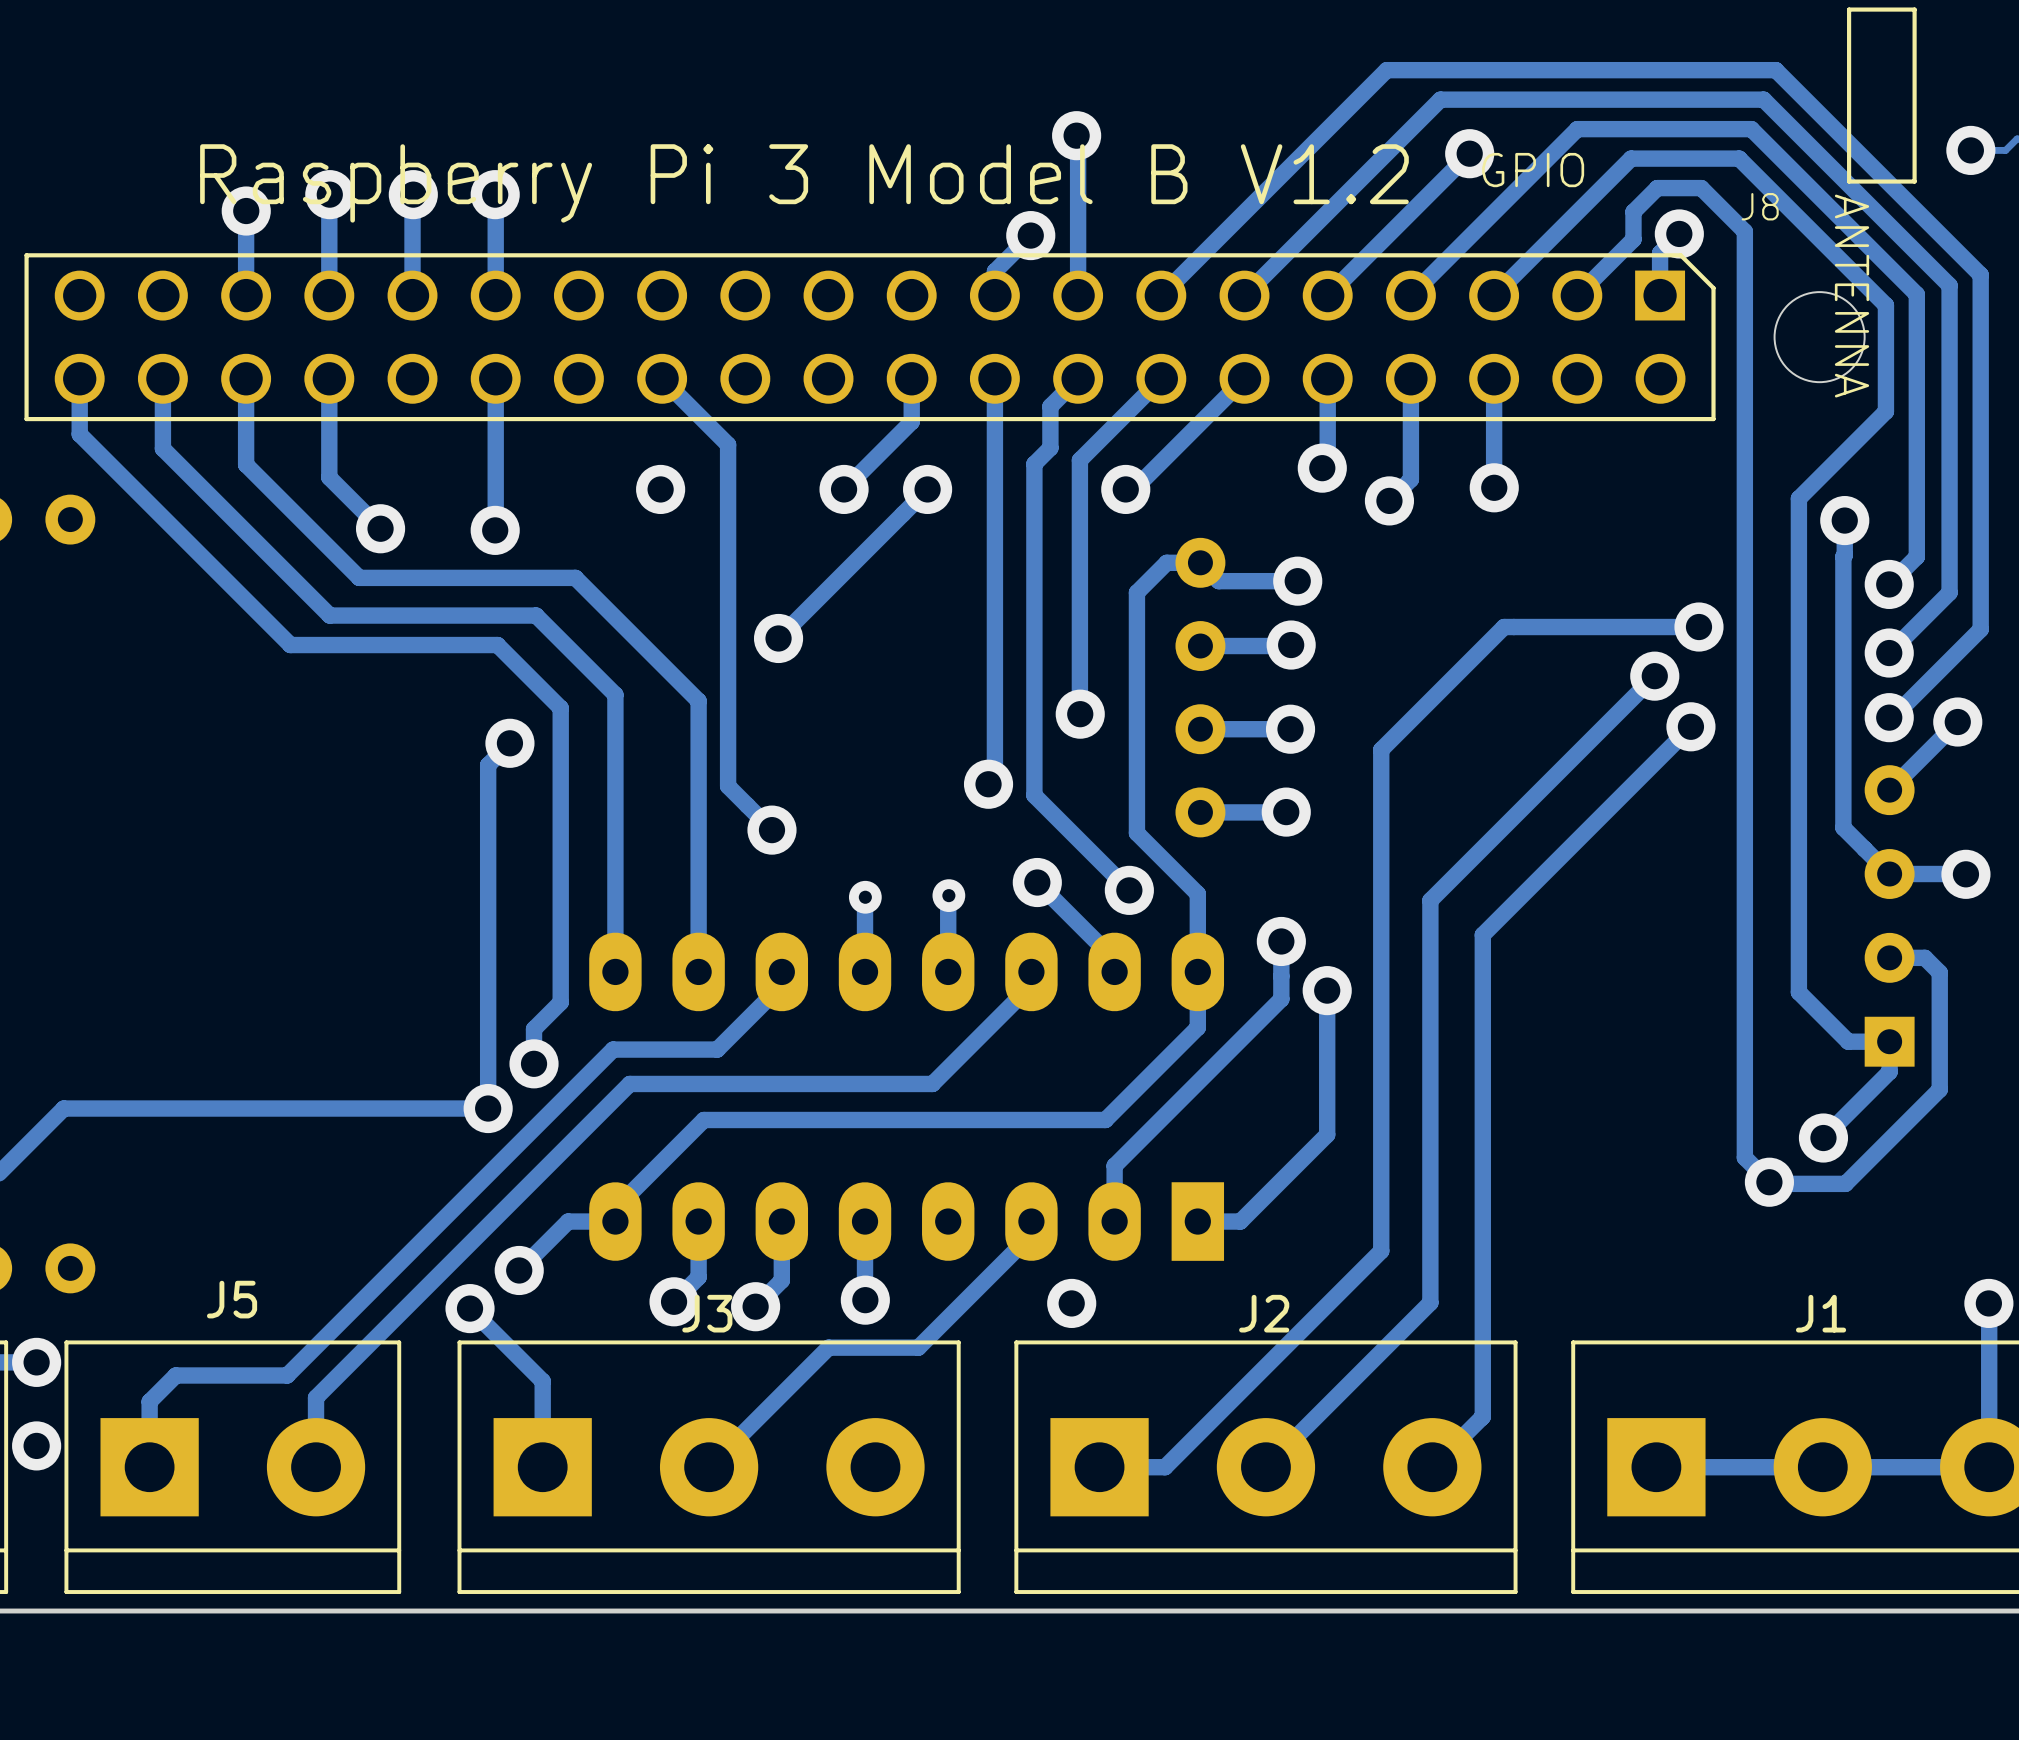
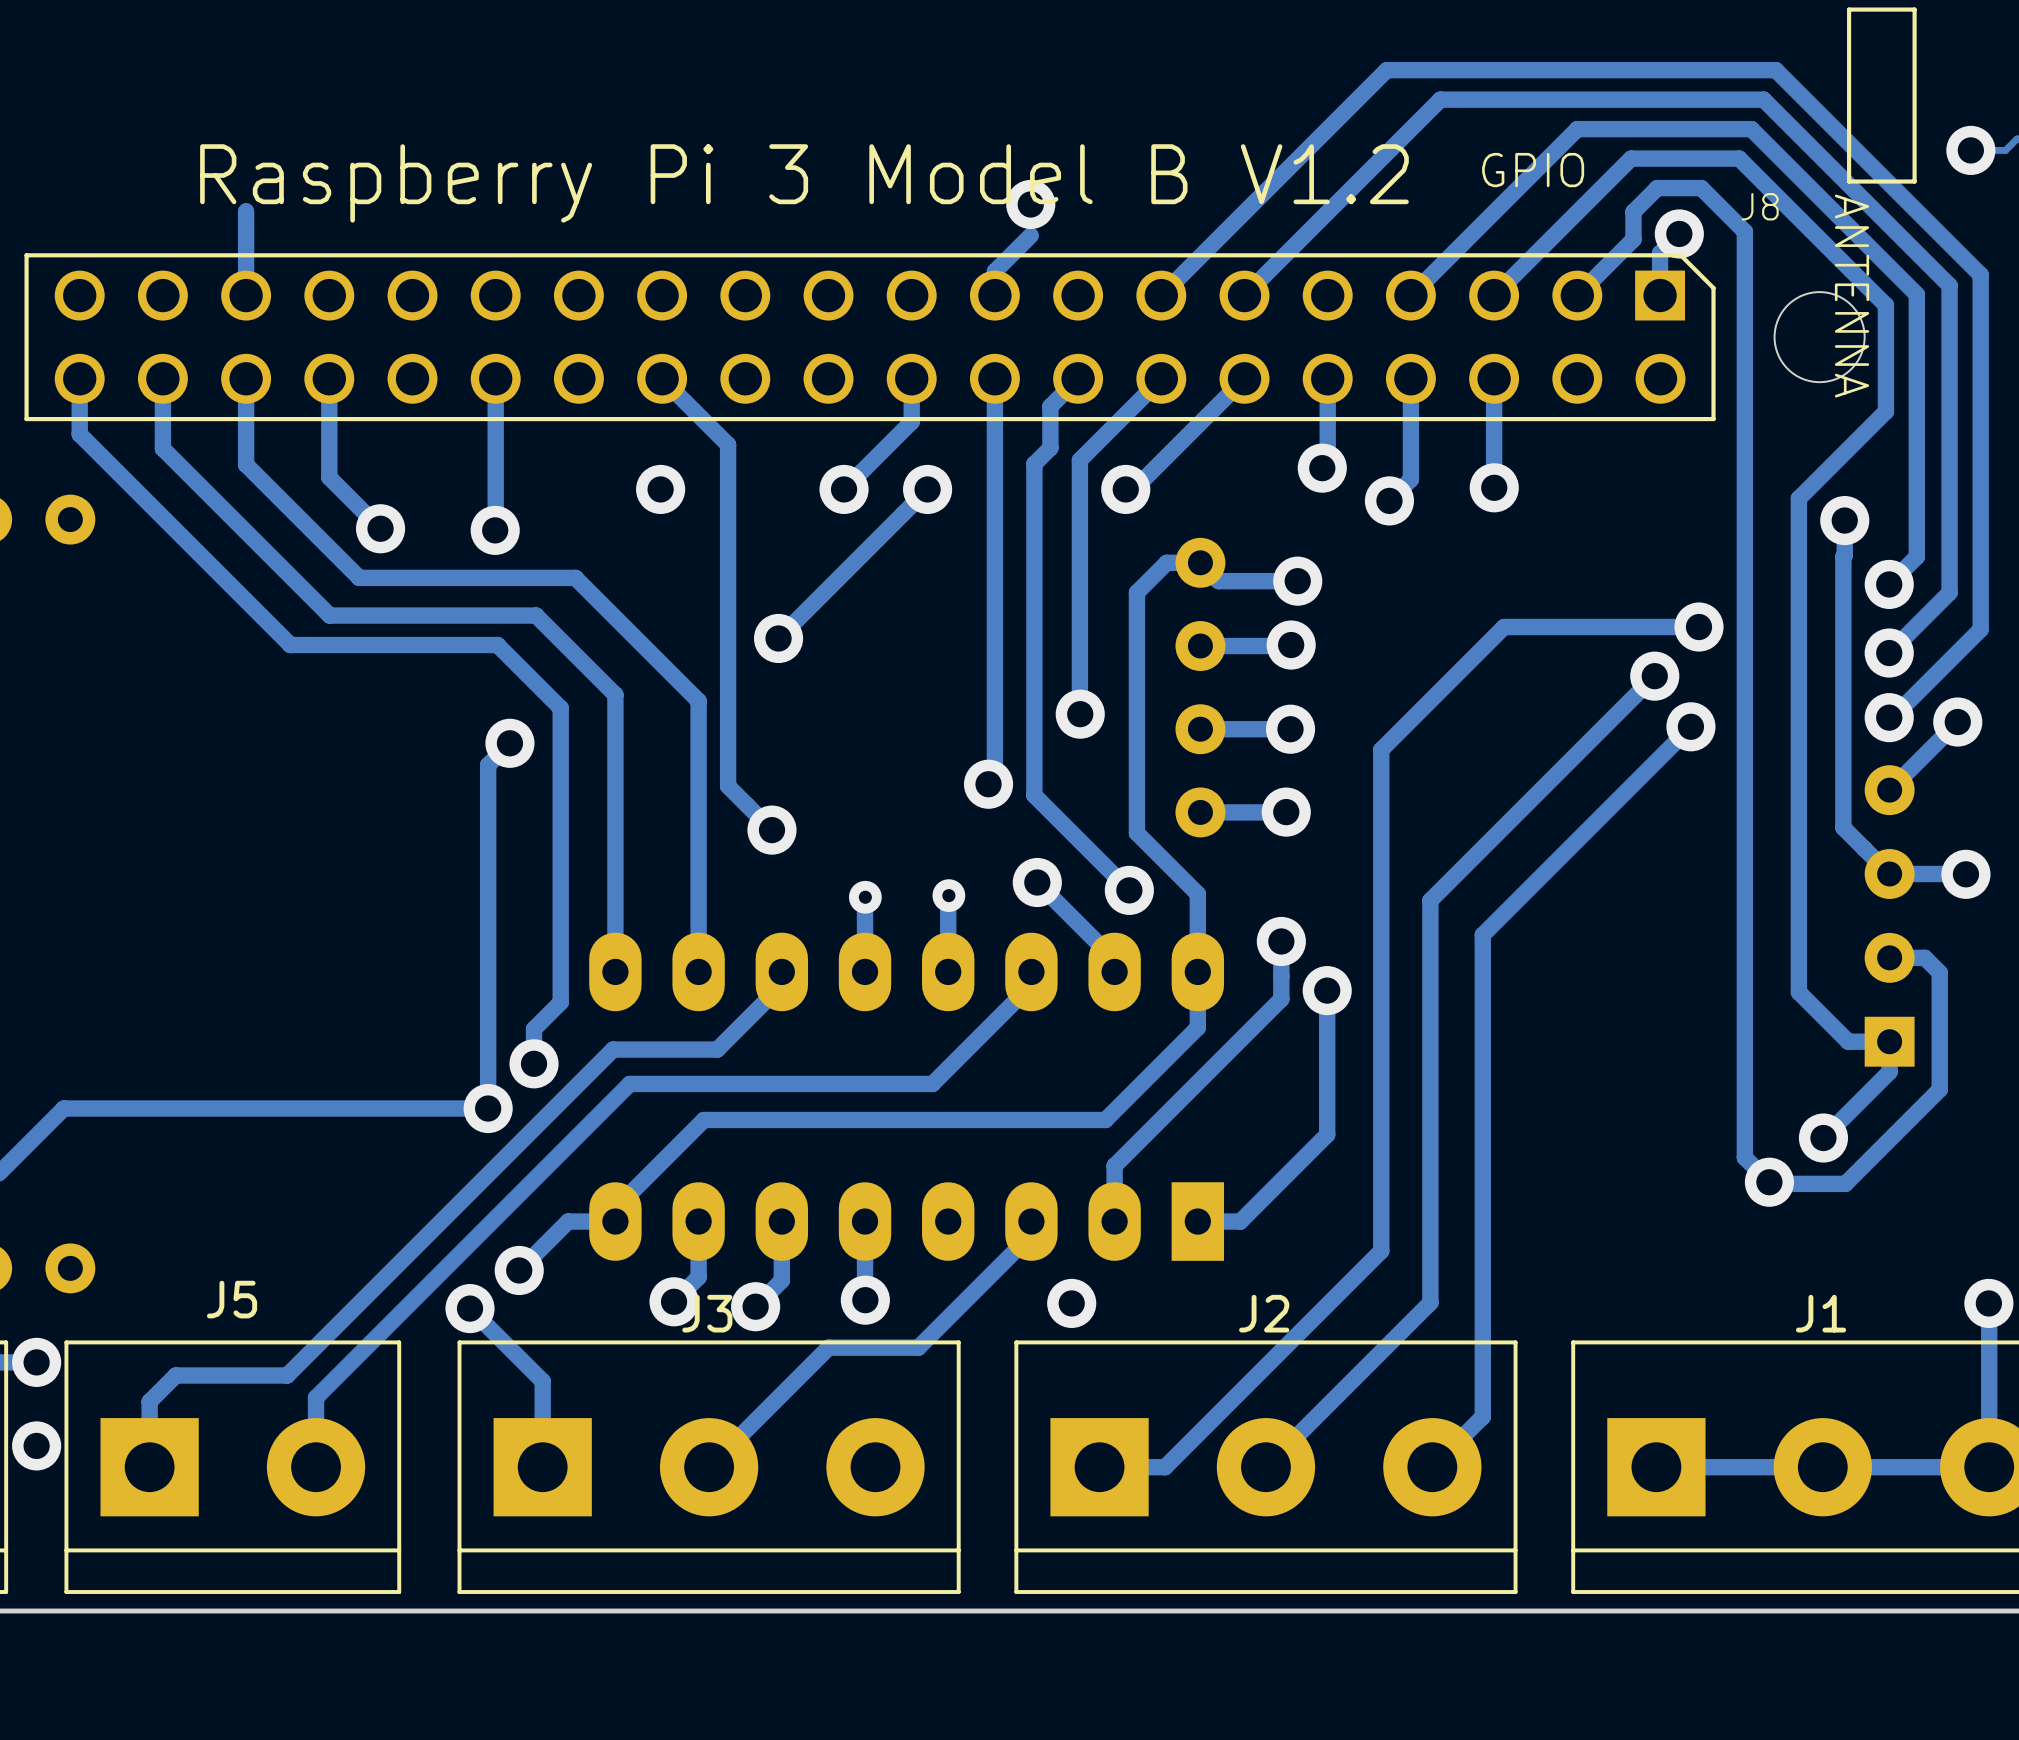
track: (1076, 135) (1078, 295) -> none
via: (1076, 135) -> none
track: (1469, 153) (1327, 295) -> none
via: (1469, 153) -> none
track: (329, 194) (329, 295) -> none
via: (329, 194) -> none
track: (413, 194) (412, 295) -> none
via: (413, 194) -> none
track: (495, 194) (495, 295) -> none
via: (495, 194) -> none
via: (246, 211) -> none
via position: (1030, 235) -> (1030, 204)

